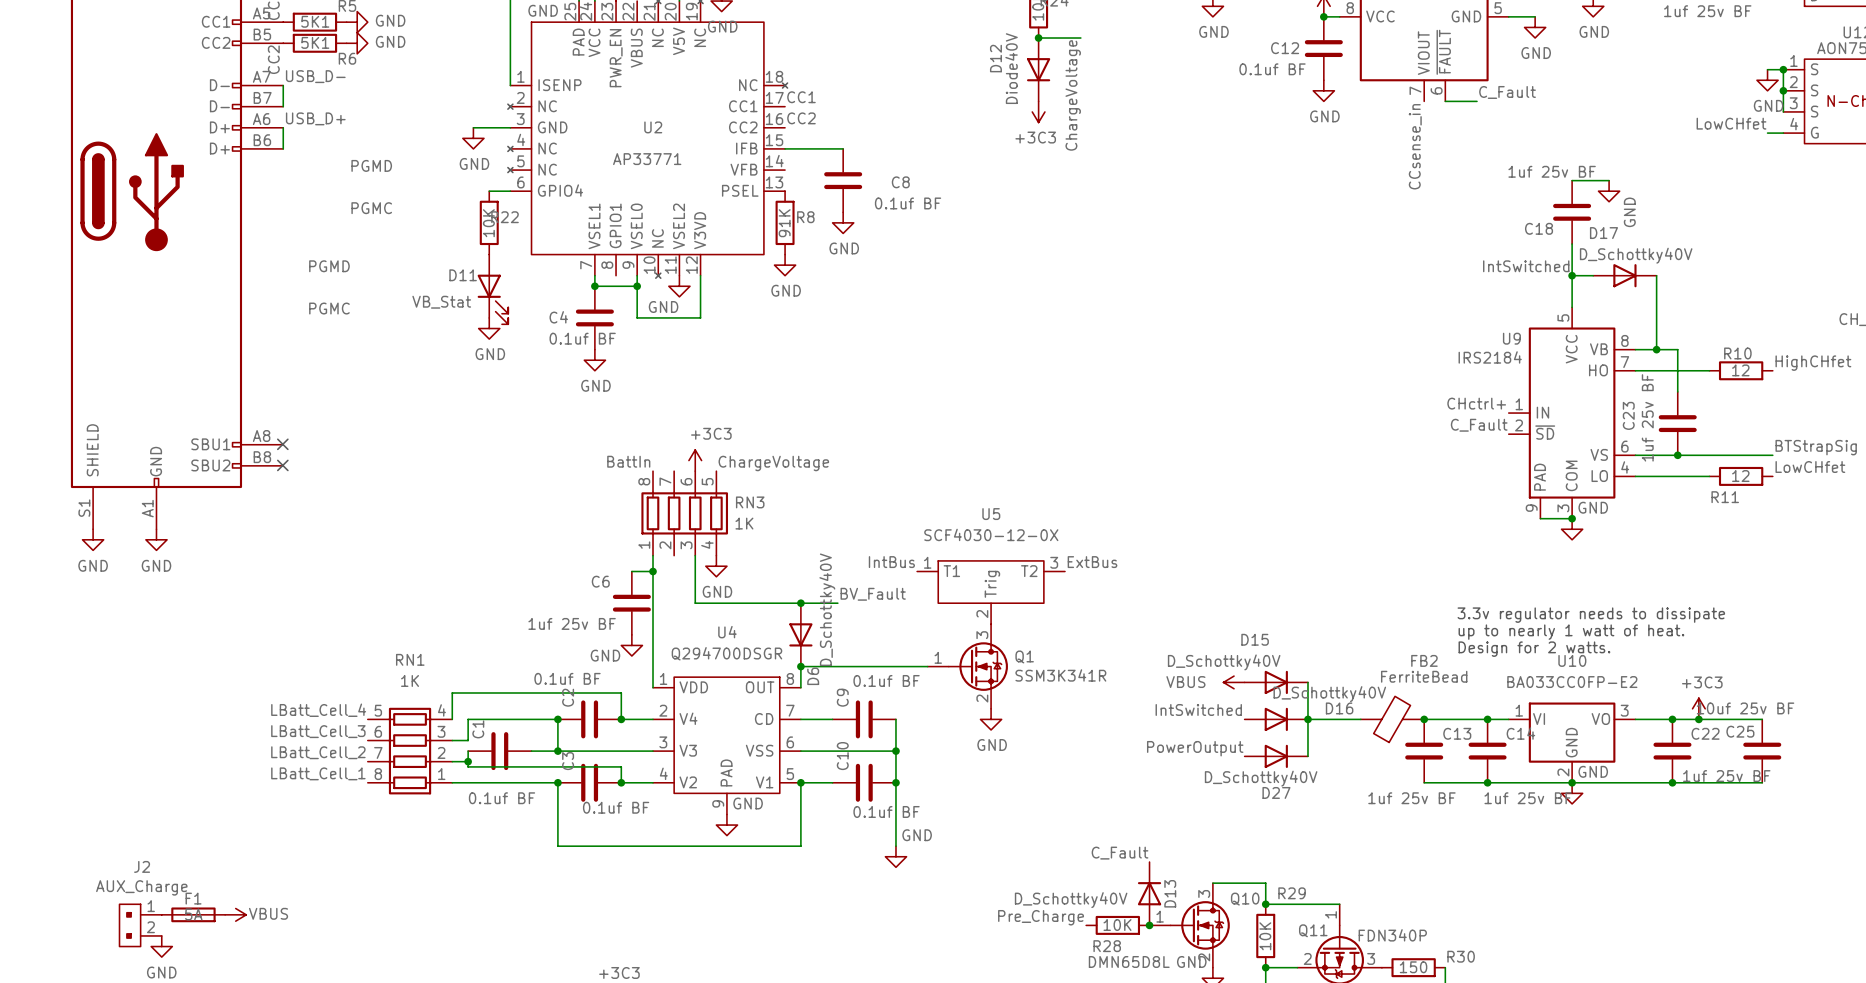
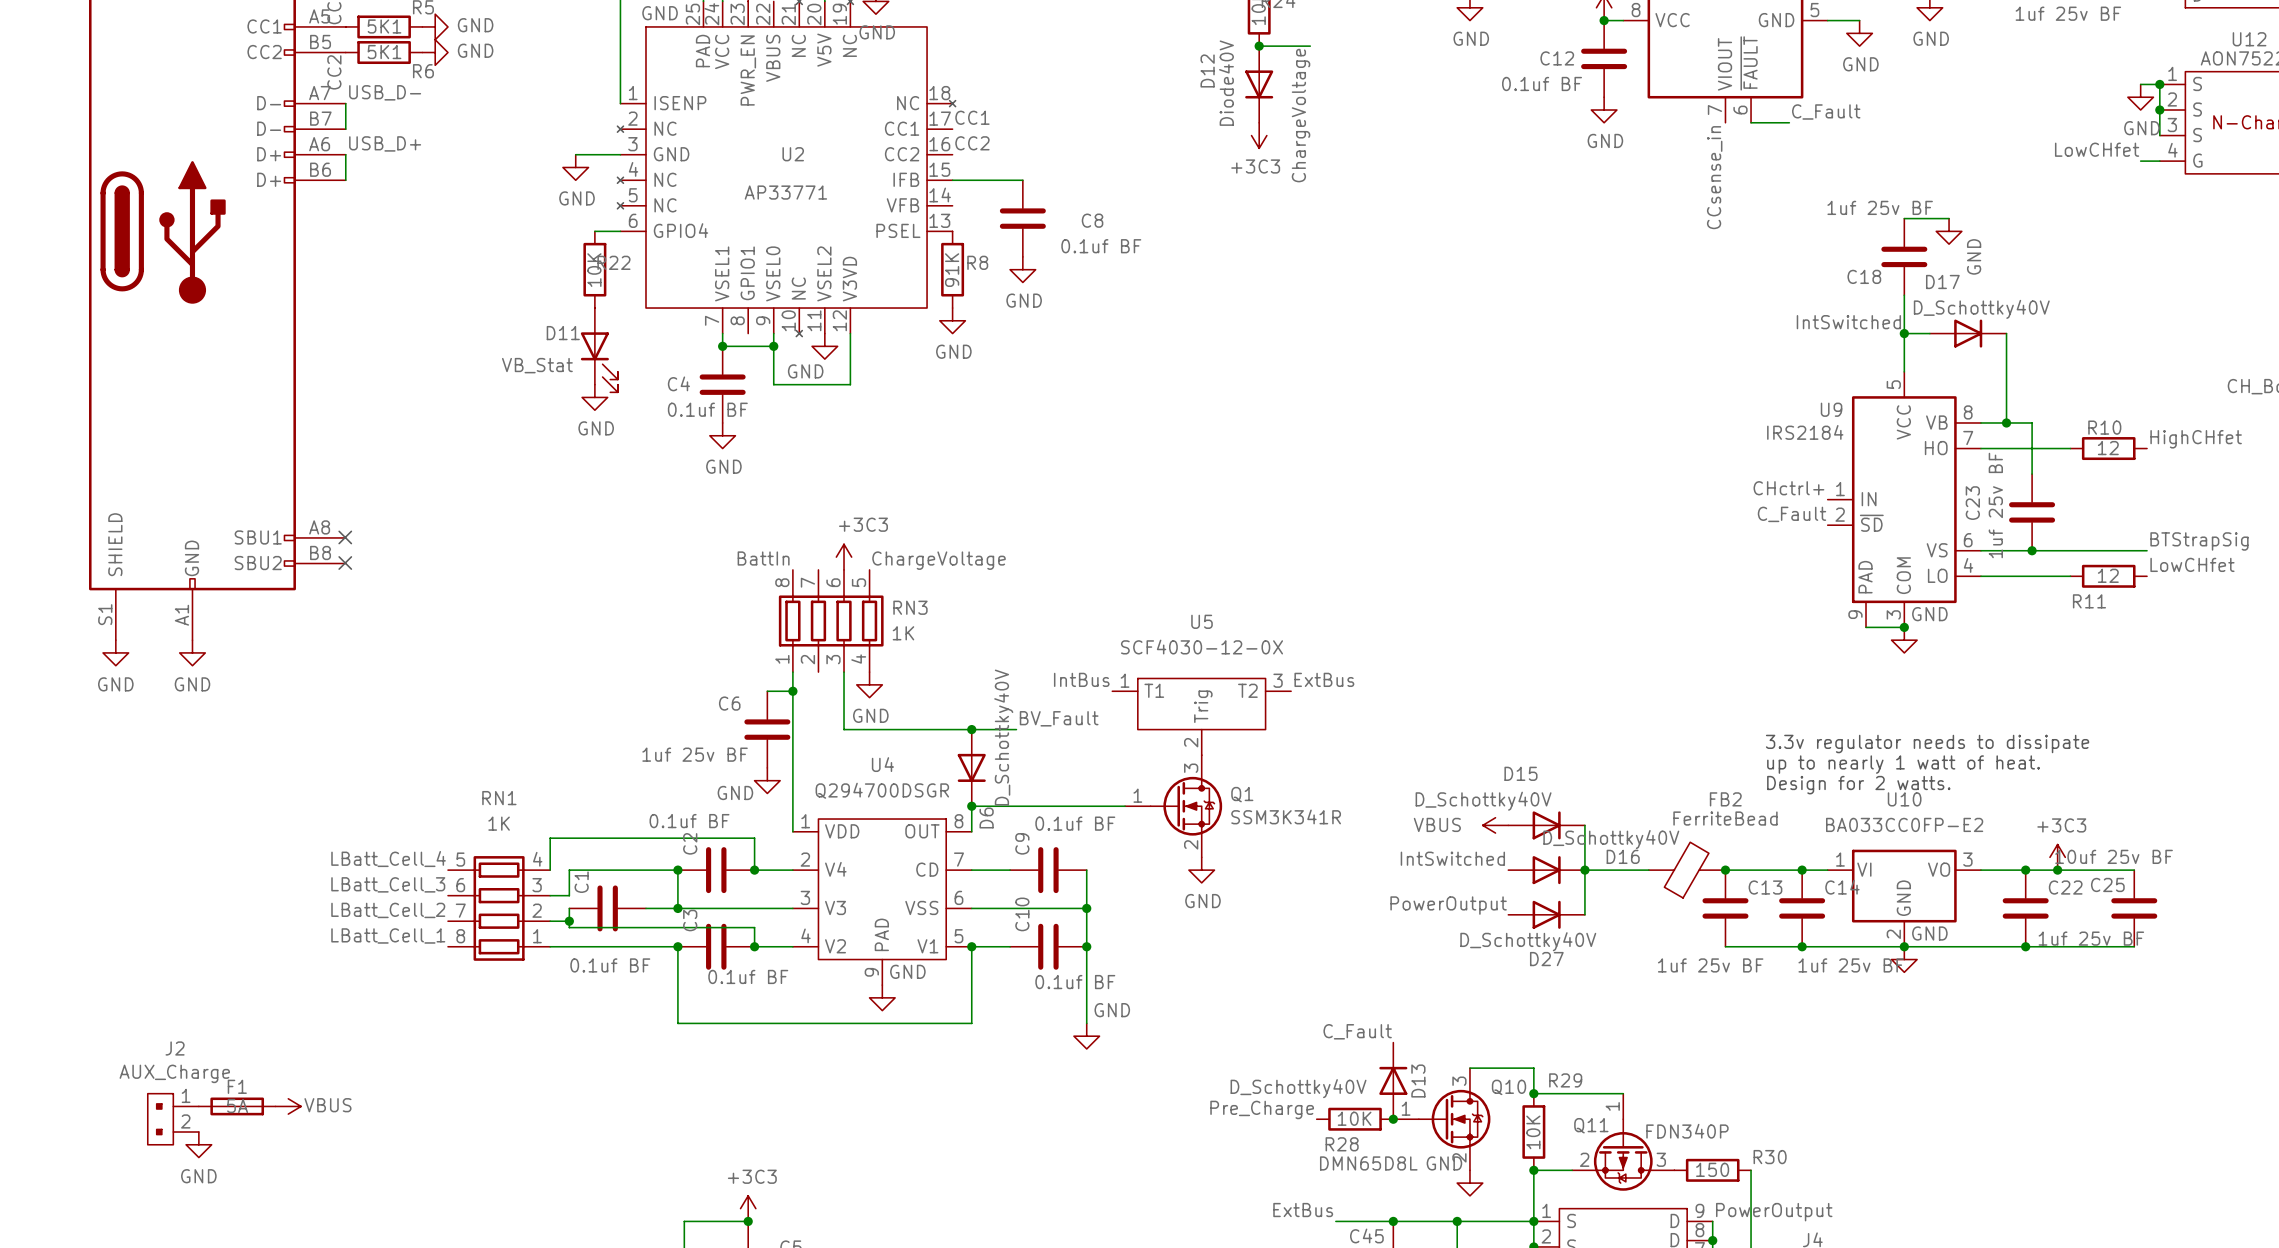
label: PGMD (371, 165) -> none
label: PGMC (371, 208) -> none
label: PGMD (329, 266) -> none
label: PGMC (329, 308) -> none

